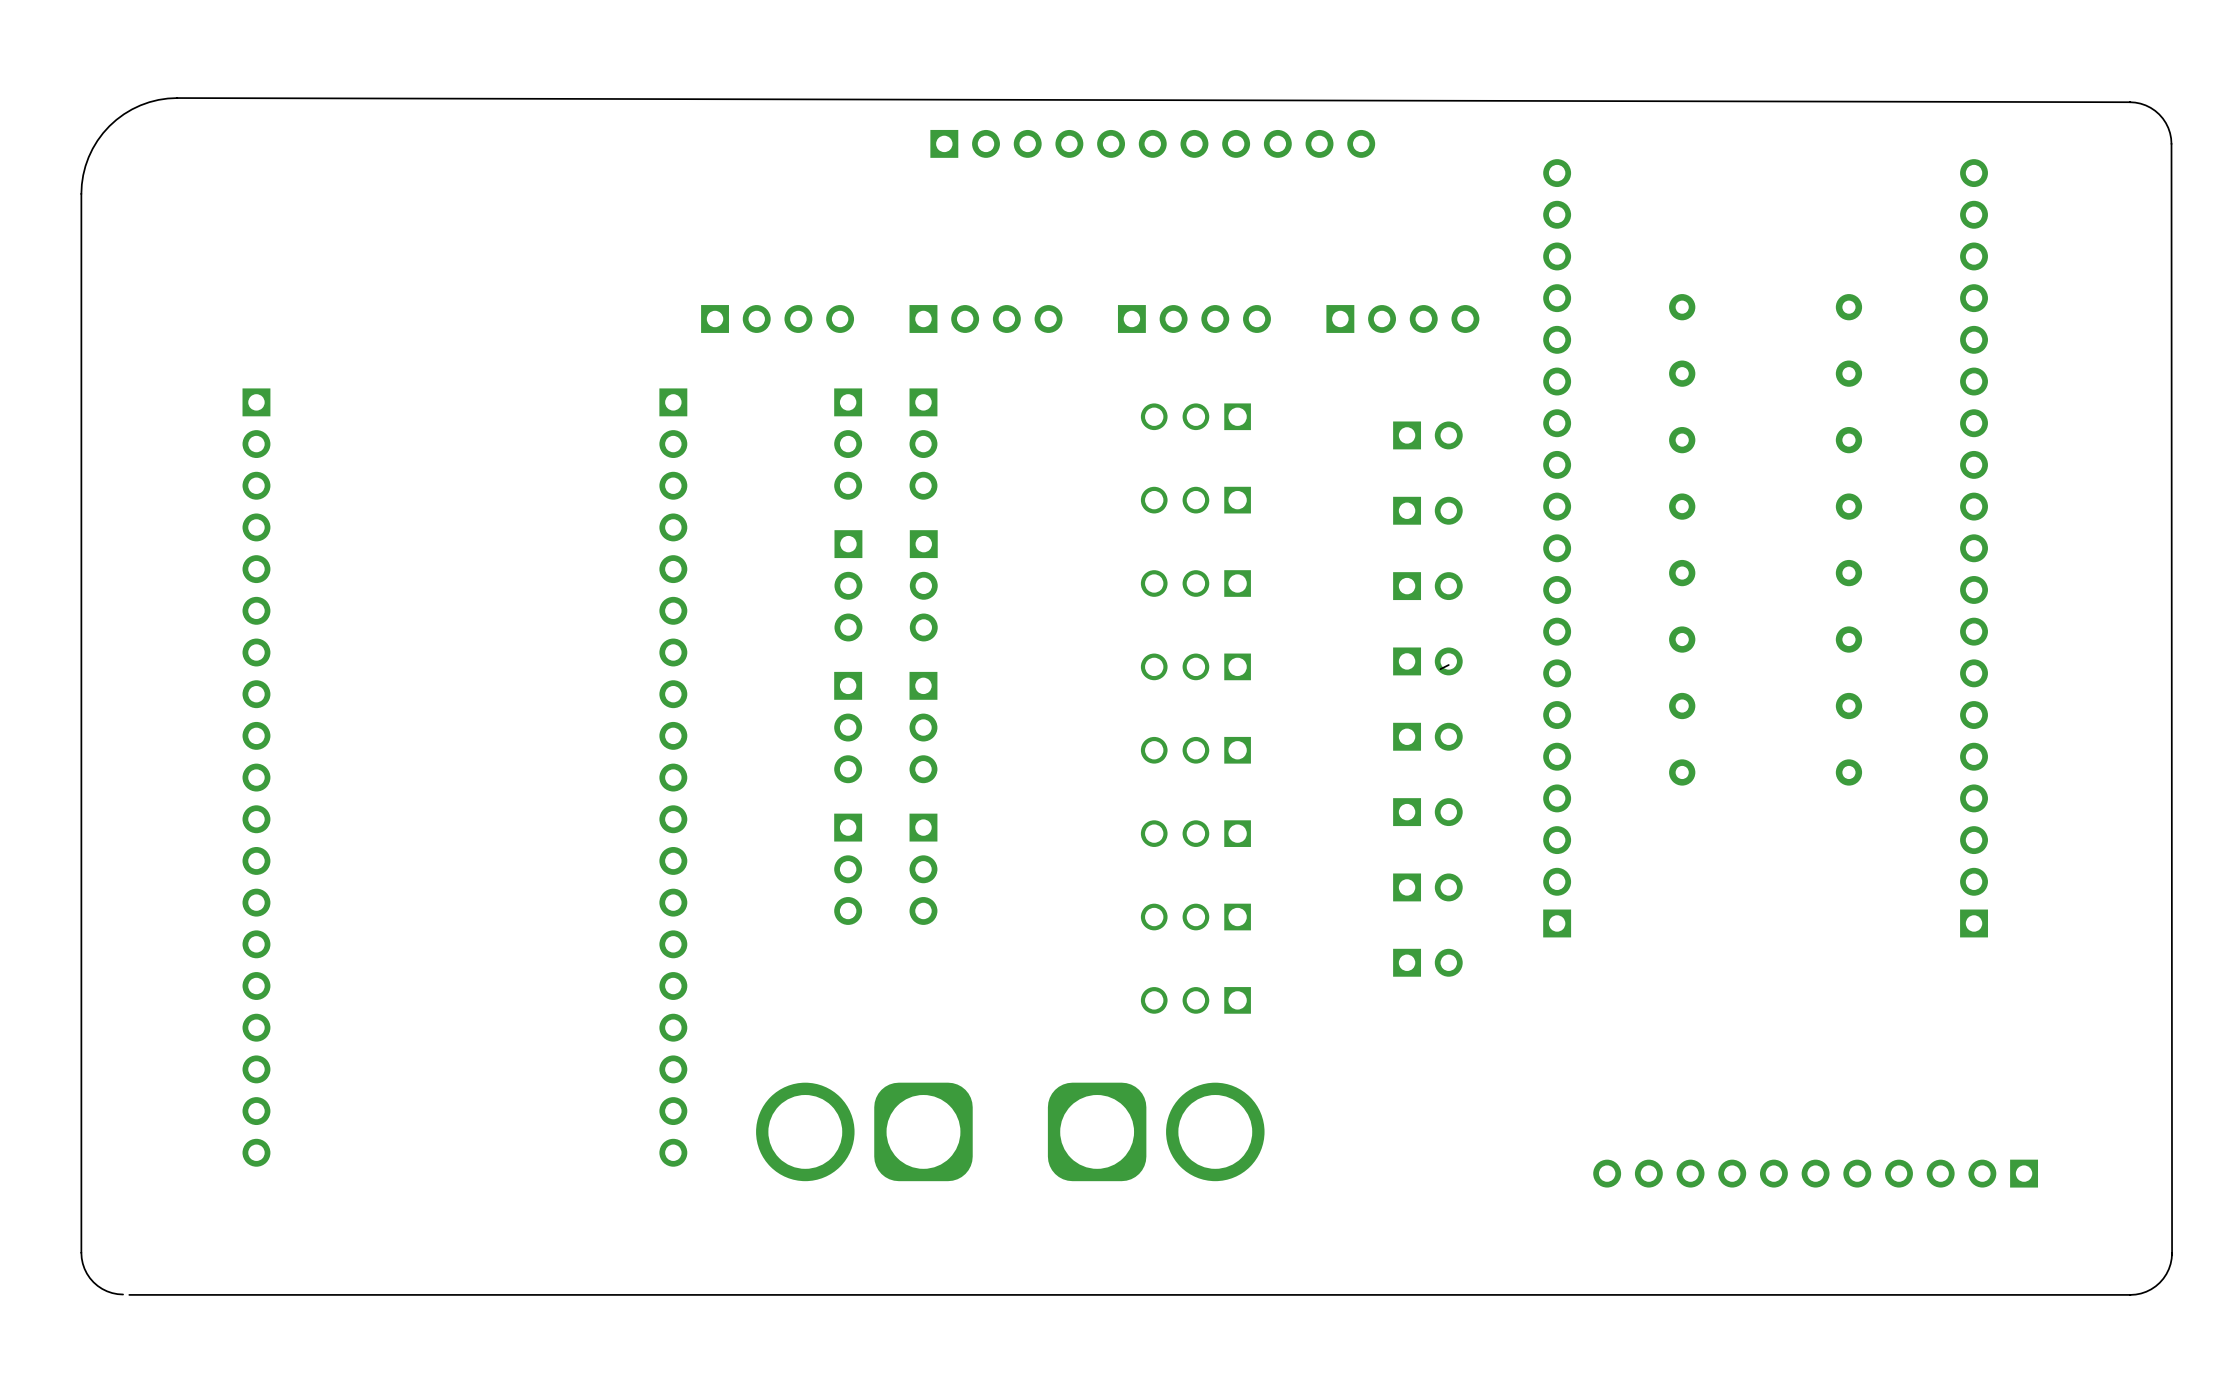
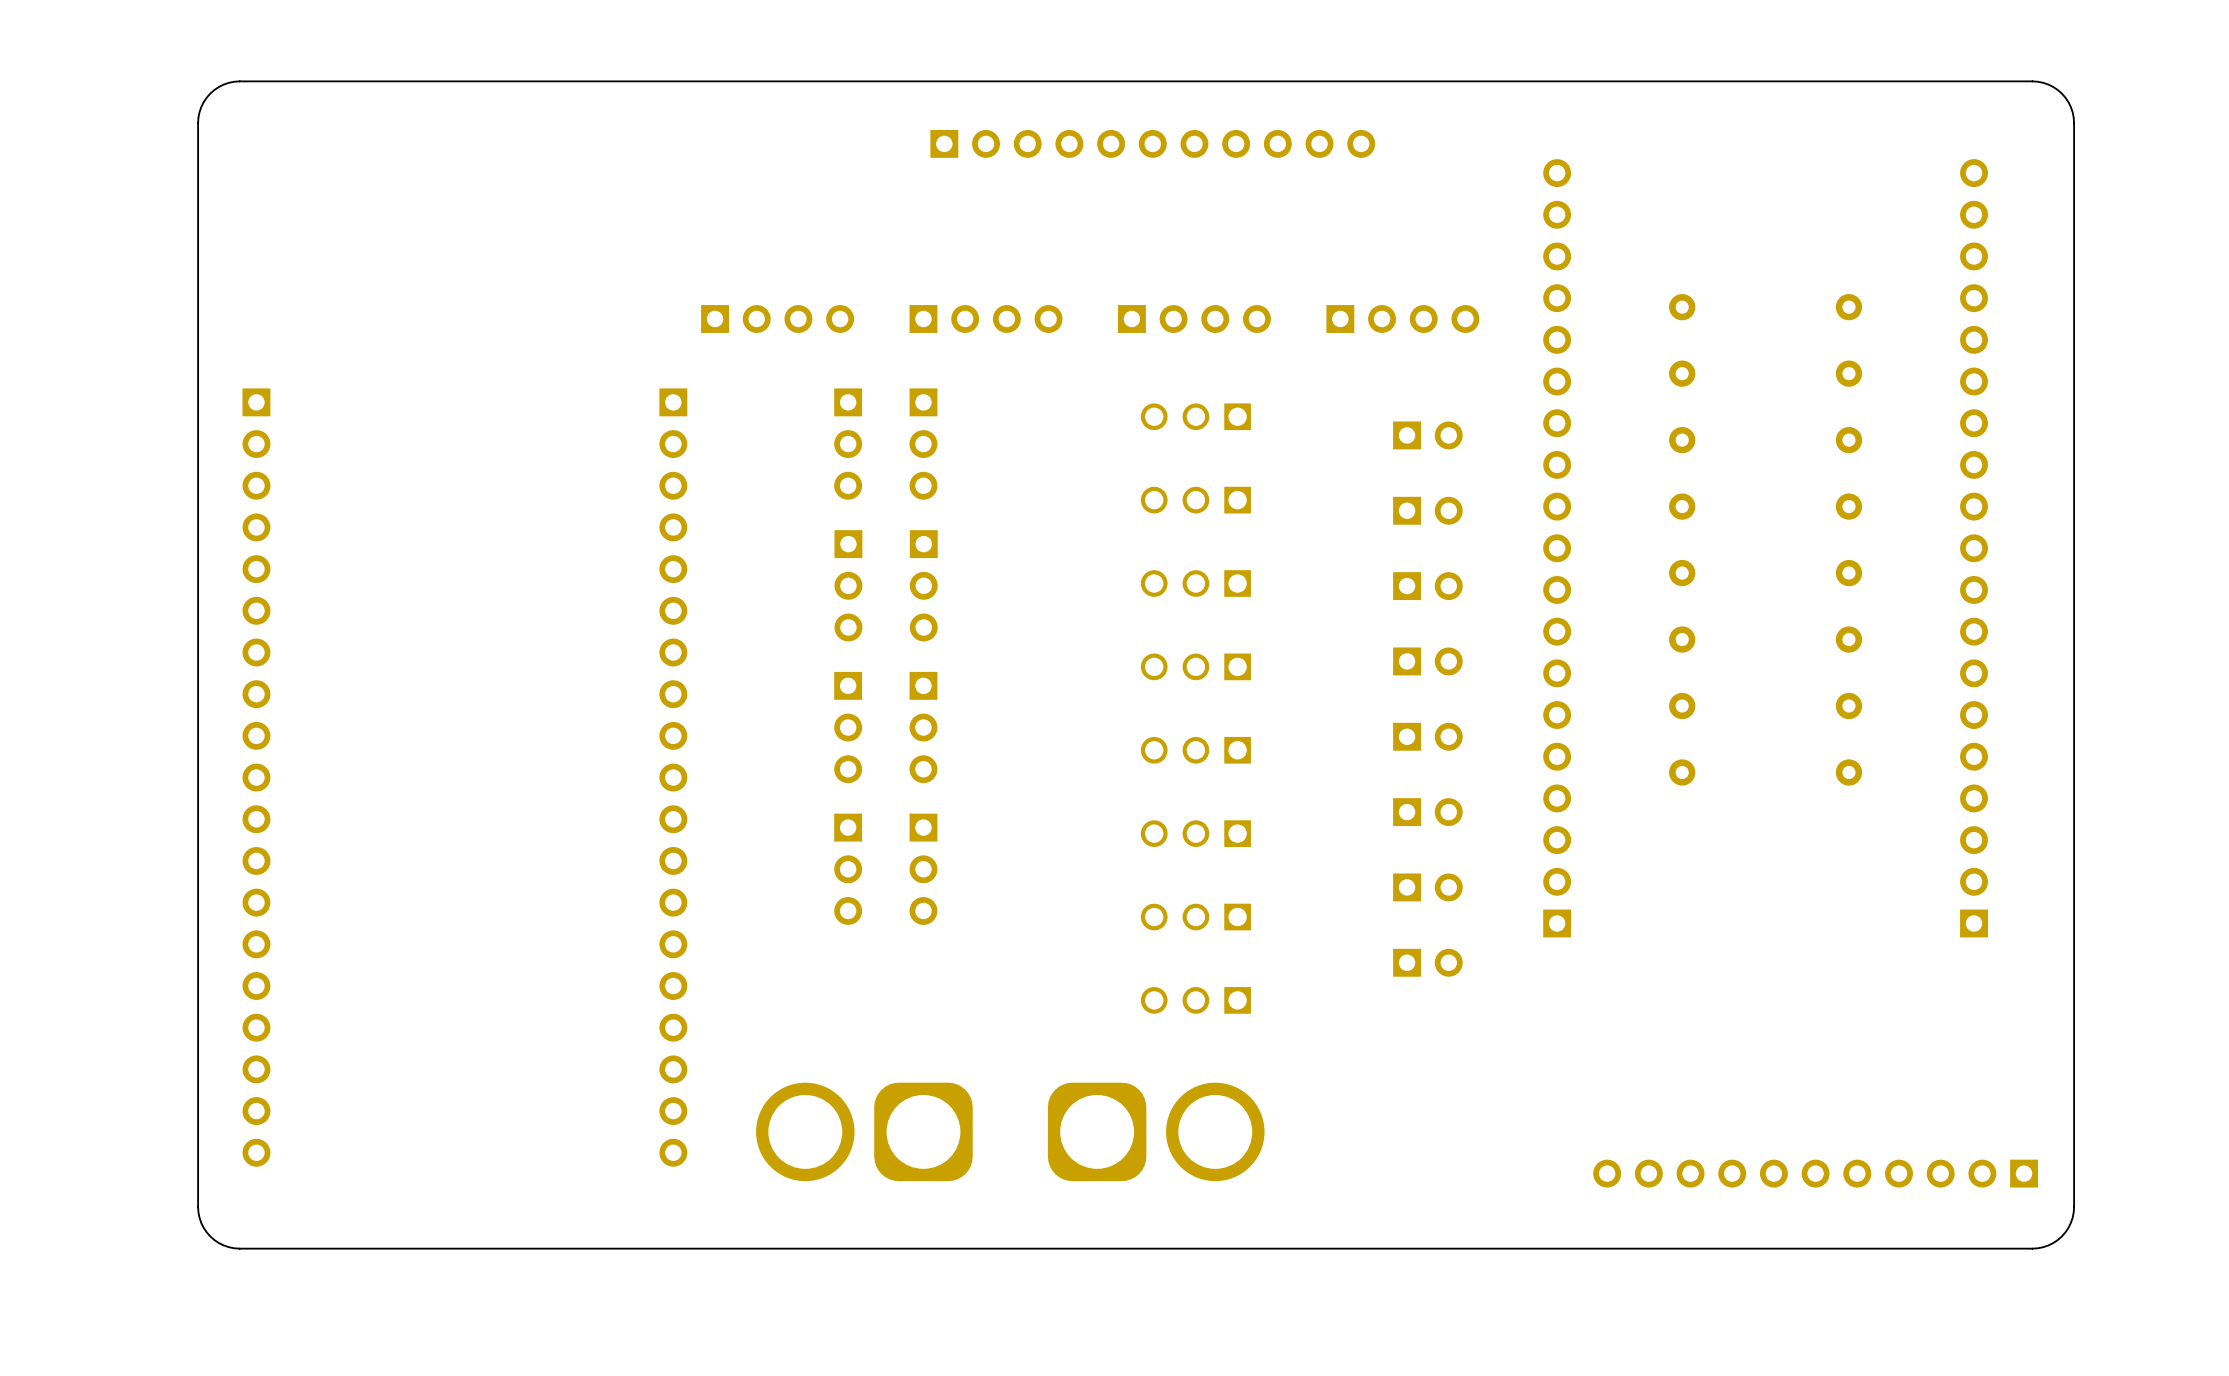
board edge: none -> (2032, 81) (239, 81) (218, 86) (203, 102) (198, 123) (198, 1206) (203, 1227) (218, 1243) (239, 1248) (2032, 1248) (2053, 1243) (2068, 1227) (2074, 1206) (2074, 123) (2070, 107) (2061, 93) (2048, 84) (2032, 81)
board edge: (2129, 102) (2145, 105) (2159, 114) (2168, 127) (2171, 143) (2172, 1255) -> none
board edge: (2130, 102) (177, 98) (149, 102) (132, 109) (116, 119) (97, 140) (85, 166) (81, 193) (81, 1252) (84, 1268) (93, 1282) (107, 1291) (123, 1294) -> none
board edge: (1448, 665) (1440, 669) -> none
board edge: (2172, 1253) (2168, 1269) (2159, 1282) (2146, 1291) (2130, 1294) (129, 1294) -> none

